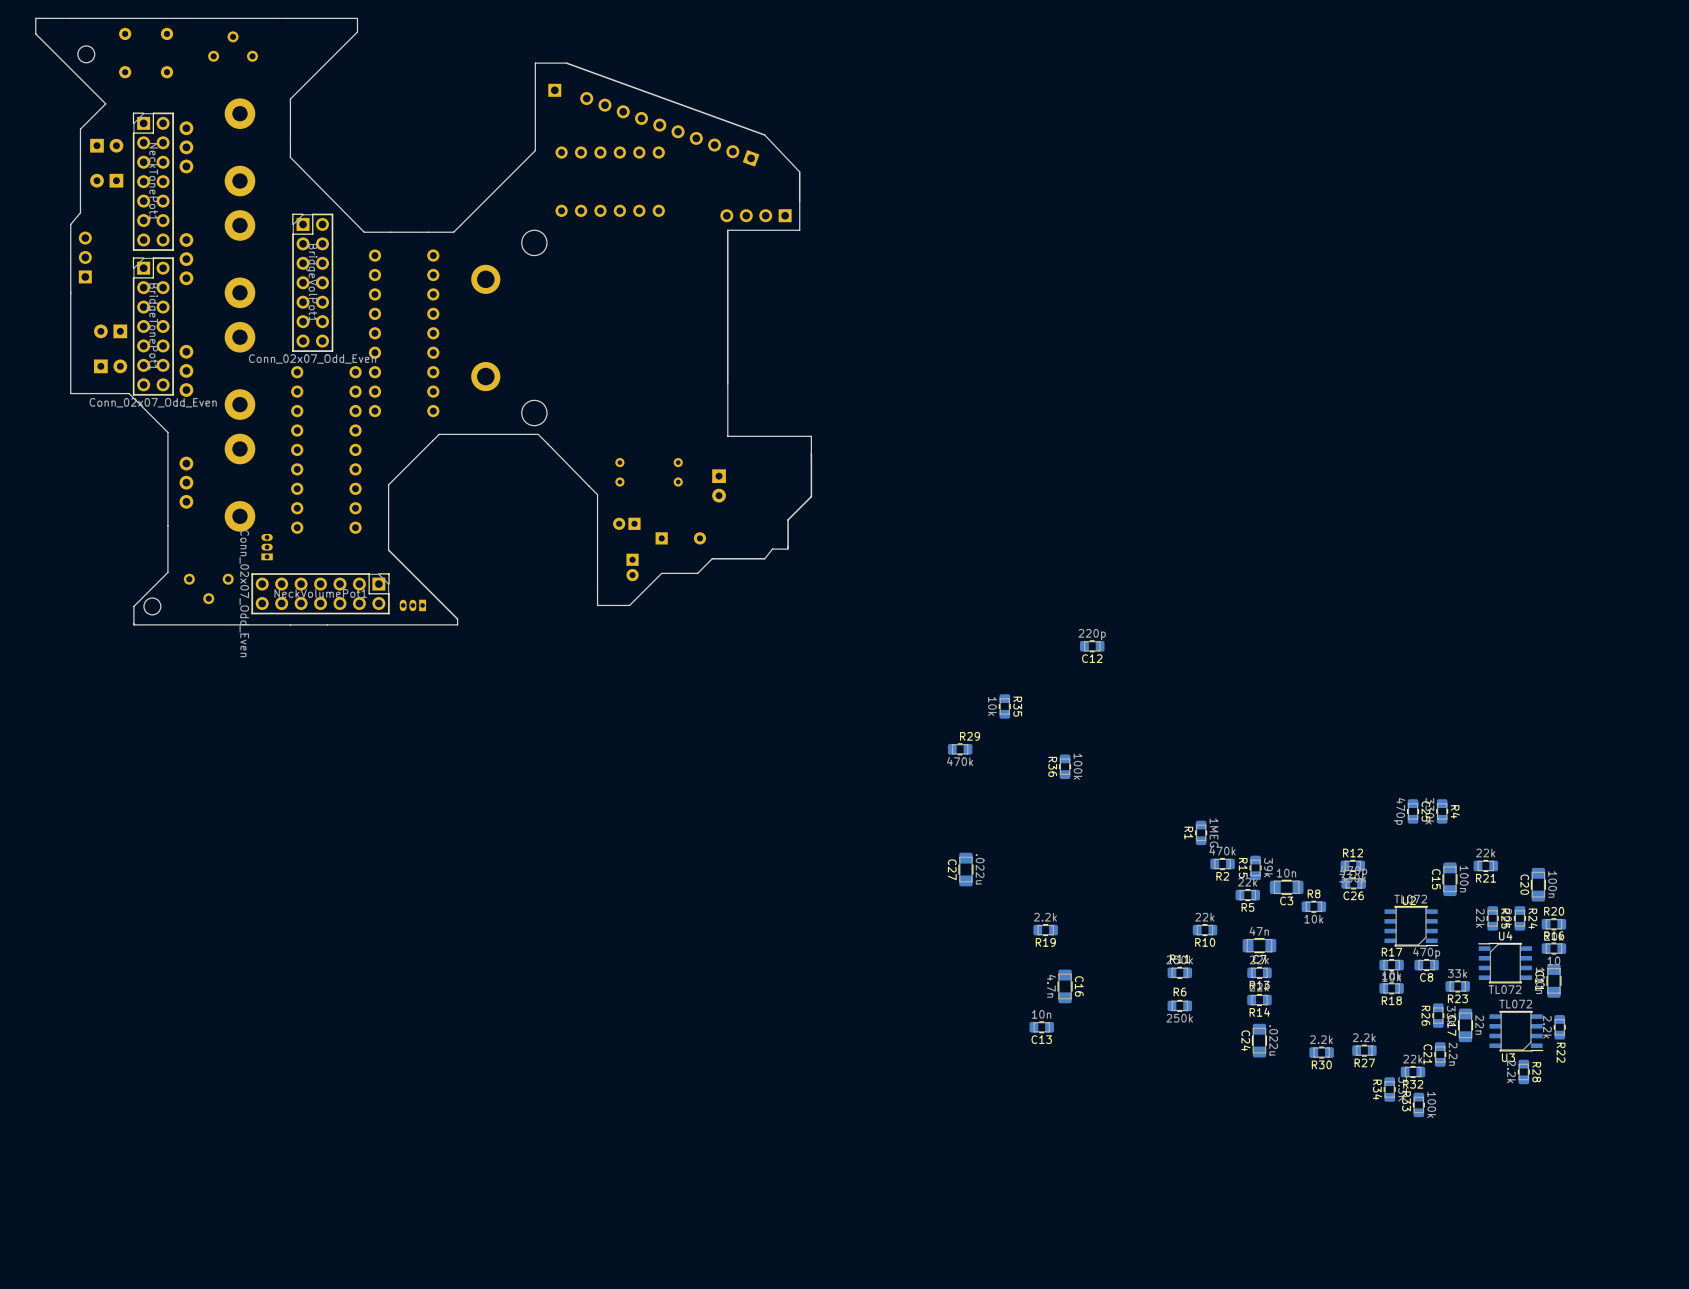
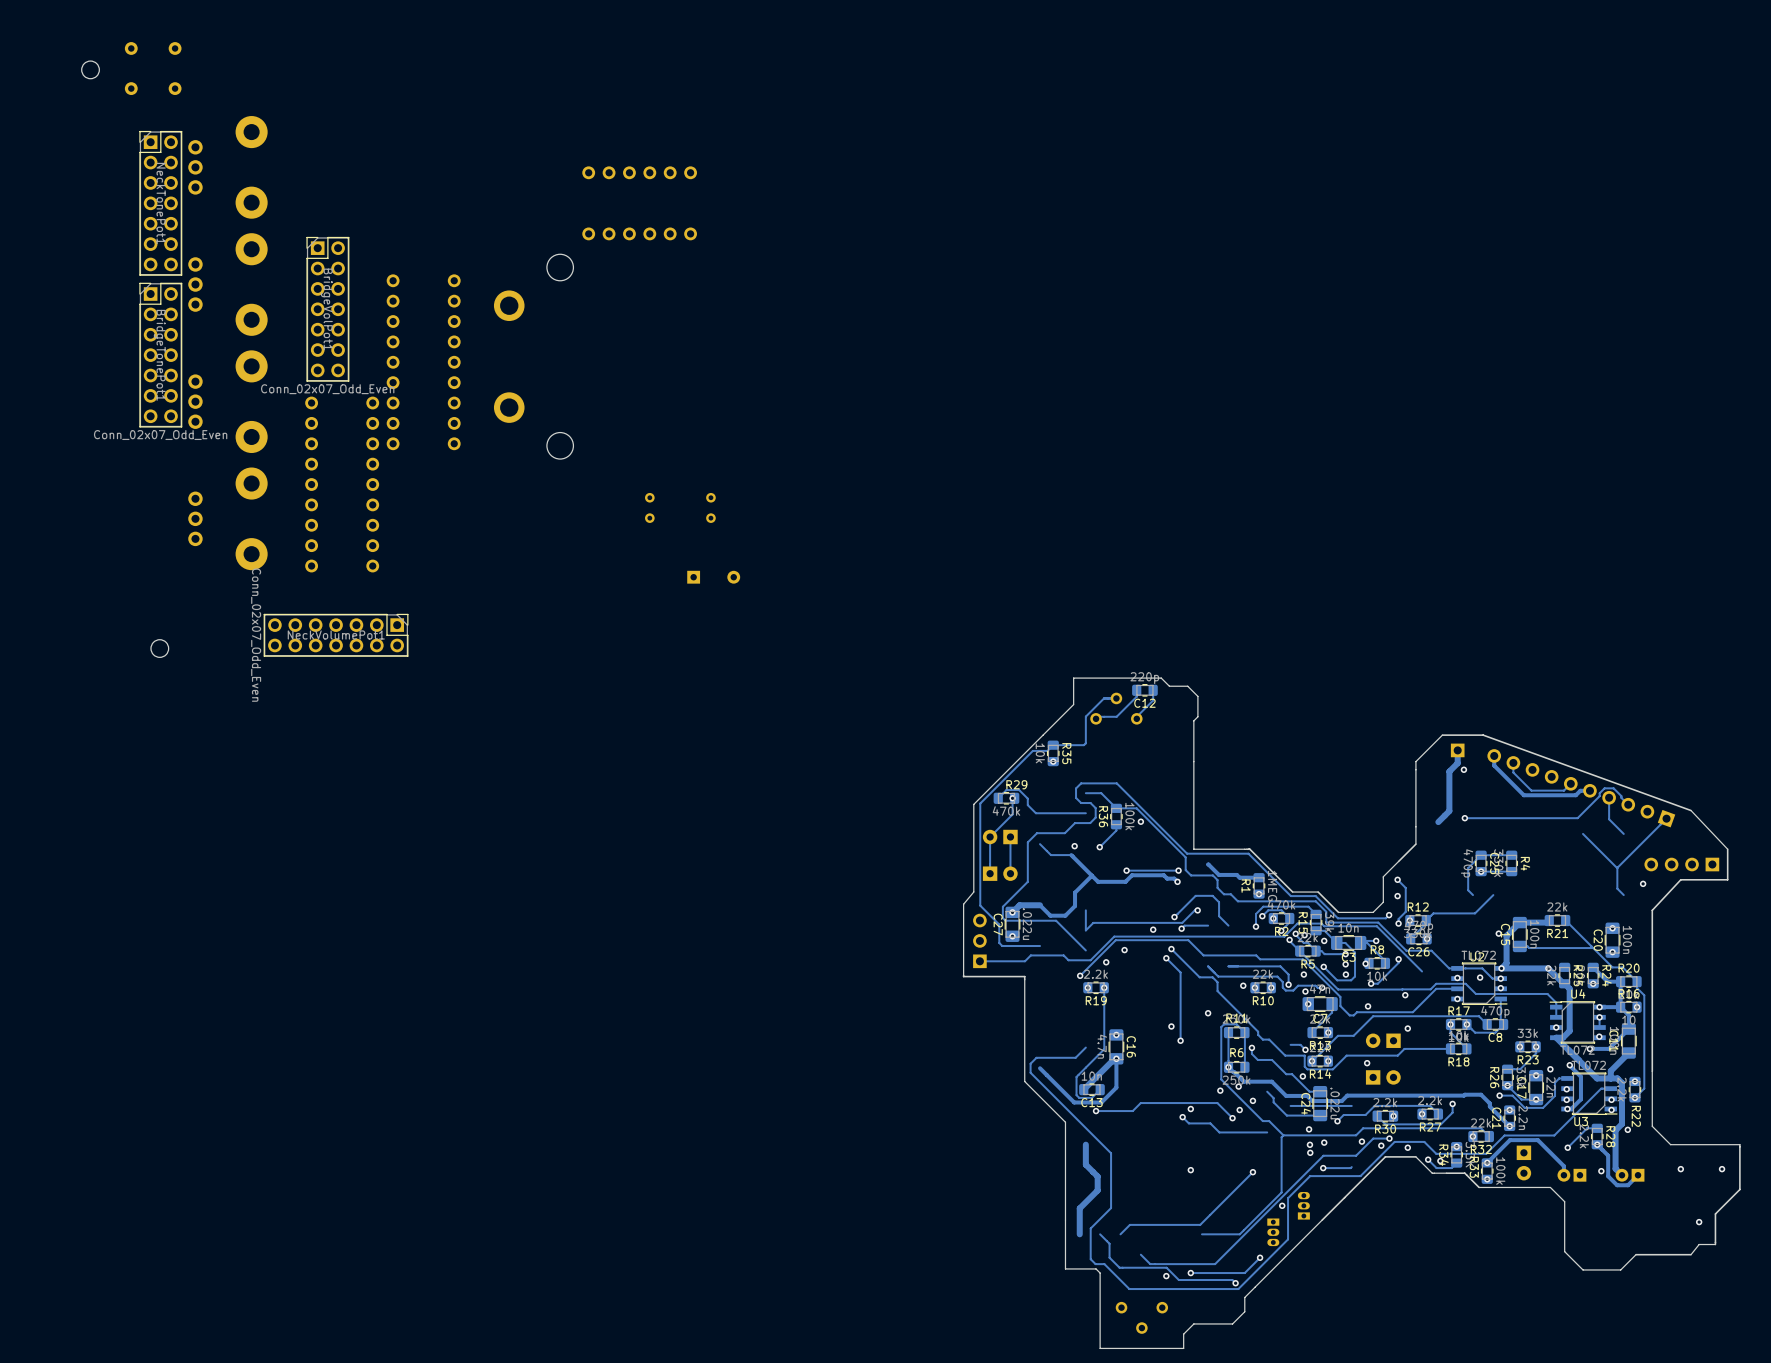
board edge: (357, 18) (35, 18) (35, 33) (105, 103) (80, 129) (80, 212) (70, 224) (70, 393) (129, 393) (167, 432) (167, 572) (133, 606) (133, 624) (457, 624) (457, 619) (388, 550) (388, 484) (439, 434) (538, 434) (597, 494) (597, 605) (629, 605) (661, 573) (697, 573) (712, 558) (764, 558) (772, 549) (788, 549) (788, 519) (811, 496) (811, 436) (727, 436) (727, 230) (799, 230) (799, 171) (764, 135) (566, 63) (535, 63) (535, 150) (453, 232) (364, 232) (290, 157) (290, 99) (357, 32) (357, 18) -> none
part: (233, 46) -> none
part: (554, 90) -> none
part: (669, 129) -> none
part: (106, 145) -> none
part: (106, 180) -> none
part: (755, 215) -> none
part: (85, 257) -> none
part: (110, 331) -> none
part: (110, 366) -> none
part: (719, 485) -> none
part: (626, 523) -> none
part: (267, 547) -> none
part: (632, 567) -> none
part: (208, 588) -> none
part: (412, 605) -> none
board edge: none -> (1161, 678) (1169, 686) (1187, 686) (1197, 696) (1197, 716) (1193, 720) (1193, 849) (1249, 849) (1292, 892) (1318, 892) (1338, 912) (1373, 912) (1383, 902) (1383, 876) (1415, 844) (1415, 761) (1442, 735) (1483, 735) (1691, 810) (1727, 849) (1727, 879) (1680, 879) (1652, 910) (1652, 1126) (1670, 1144) (1739, 1144) (1739, 1189) (1715, 1213) (1715, 1244) (1699, 1244) (1691, 1254) (1635, 1254) (1620, 1269) (1583, 1269) (1564, 1251) (1564, 1201) (1550, 1187) (1479, 1187) (1464, 1173) (1432, 1173) (1415, 1156) (1385, 1156) (1244, 1297) (1244, 1311) (1232, 1323) (1193, 1323) (1183, 1334) (1183, 1348) (1100, 1348) (1100, 1273) (1096, 1268) (1065, 1268) (1065, 1122) (1024, 1081) (1024, 976) (963, 976) (963, 904) (973, 892) (973, 804) (1073, 704) (1073, 678) (1161, 678)
track: none -> (1136, 690) (1136, 696) (1116, 716) (1096, 716)
track: none -> (1153, 690) (1153, 700) (1136, 716)
track: none -> (1116, 698) (1104, 698) (1085, 716) (1085, 743) (1083, 745) (1053, 745) (1047, 750) (1032, 750) (980, 803) (980, 905) (999, 924) (999, 942) (1002, 946) (1040, 946)
part: none -> (1116, 708)
track: none -> (1457, 750) (1457, 763) (1449, 771) (1449, 811) (1438, 822)
part: none -> (1457, 750)
track: none -> (1494, 755) (1494, 765) (1523, 795) (1575, 795) (1580, 790) (1589, 790)
via: none -> (1053, 761)
track: none -> (1513, 762) (1513, 772) (1531, 790) (1564, 790) (1570, 783)
via: none -> (1463, 769)
part: none -> (1581, 788)
track: none -> (1085, 793) (1101, 793) (1116, 808) (1136, 808) (1185, 857) (1185, 870) (1191, 875) (1212, 875) (1217, 880) (1217, 887) (1223, 894) (1230, 894) (1237, 901) (1315, 901) (1326, 911) (1326, 922) (1378, 922) (1406, 950) (1431, 950) (1449, 968) (1482, 968) (1492, 978) (1500, 978)
track: none -> (1609, 797) (1609, 819) (1623, 833)
track: none -> (998, 798) (1006, 790) (1019, 790) (1027, 798) (1027, 805) (1035, 813) (1085, 813)
track: none -> (1012, 798) (1012, 814) (990, 837) (990, 873)
via: none -> (1012, 798)
track: none -> (1628, 804) (1613, 788) (1604, 788) (1599, 793) (1599, 796) (1577, 818) (1464, 818)
via: none -> (1464, 818)
track: none -> (1666, 818) (1617, 867)
via: none -> (1140, 821)
track: none -> (1116, 824) (1116, 830) (1099, 847)
track: none -> (1583, 833) (1617, 867)
part: none -> (1000, 837)
track: none -> (1010, 837) (1010, 873)
track: none -> (1040, 844) (1050, 855) (1071, 855) (1098, 881) (1125, 881) (1132, 875) (1163, 875) (1167, 878) (1174, 878) (1177, 881)
via: none -> (1074, 846)
via: none -> (1099, 847)
track: none -> (1511, 855) (1481, 855) (1468, 868) (1468, 890) (1472, 895)
track: none -> (1208, 864) (1218, 874) (1259, 877)
part: none -> (1681, 864)
track: none -> (1617, 867) (1617, 888) (1623, 895)
via: none -> (1126, 870)
track: none -> (1178, 870) (1126, 870)
via: none -> (1178, 870)
via: none -> (1481, 871)
track: none -> (1511, 871) (1481, 871)
part: none -> (1000, 873)
track: none -> (1091, 875) (1075, 892) (1075, 906) (1065, 915) (1050, 915) (1040, 905) (1019, 905) (1012, 912)
track: none -> (1397, 879) (1405, 887) (1405, 911) (1398, 919) (1398, 923)
via: none -> (1397, 879)
via: none -> (1177, 881)
via: none -> (1643, 883)
via: none -> (1259, 894)
track: none -> (1493, 895) (1475, 913) (1433, 913) (1410, 938)
via: none -> (1397, 896)
track: none -> (1197, 910) (1194, 910) (1182, 922) (1093, 922) (1085, 930) (1085, 910)
via: none -> (1197, 910)
via: none -> (1012, 912)
track: none -> (1316, 914) (1308, 906) (1263, 906) (1255, 913) (1255, 926)
track: none -> (1389, 915) (1385, 918) (1337, 918) (1315, 896) (1290, 896) (1248, 853) (1187, 853) (1116, 783) (1081, 783) (1076, 788) (1076, 797) (1081, 803) (1090, 803) (1095, 808) (1095, 817) (1090, 823) (1075, 823) (1064, 833) (1037, 833) (1027, 842) (1027, 881) (1002, 906) (1002, 918) (1005, 920) (1056, 920) (1085, 950)
via: none -> (1389, 915)
track: none -> (1262, 916) (1268, 910) (1281, 910) (1289, 918) (1289, 922) (1281, 930)
via: none -> (1262, 916)
track: none -> (1174, 917) (1195, 895) (1212, 895) (1219, 902) (1219, 916) (1228, 925)
via: none -> (1174, 917)
via: none -> (1273, 918)
via: none -> (1409, 920)
track: none -> (1549, 920) (1547, 922) (1519, 922) (1506, 935) (1506, 963) (1501, 968)
track: none -> (1565, 920) (1612, 967) (1622, 967) (1637, 981)
via: none -> (1398, 923)
track: none -> (1208, 925) (1184, 925) (1181, 928)
via: none -> (1255, 926)
via: none -> (1181, 928)
via: none -> (1612, 928)
via: none -> (1153, 929)
via: none -> (1281, 930)
track: none -> (1316, 930) (1324, 930) (1336, 942) (1345, 942) (1355, 952) (1355, 976) (1351, 980) (1337, 980) (1323, 966)
track: none -> (1295, 933) (1303, 942) (1307, 942) (1316, 951) (1321, 951) (1324, 954) (1345, 954)
via: none -> (1295, 933)
via: none -> (1498, 933)
via: none -> (1304, 935)
via: none -> (1012, 936)
via: none -> (1427, 938)
track: none -> (1289, 939) (1338, 989) (1430, 989) (1436, 983) (1465, 983) (1475, 993) (1547, 993) (1556, 1002) (1556, 1017)
via: none -> (1289, 939)
part: none -> (979, 940)
via: none -> (1324, 940)
track: none -> (1376, 940) (1362, 940) (1360, 942) (1367, 942) (1385, 963)
via: none -> (1376, 940)
track: none -> (1519, 946) (1593, 948)
track: none -> (1171, 949) (1199, 977) (1212, 977) (1217, 982) (1217, 991) (1258, 1031) (1258, 1034) (1262, 1039) (1269, 1039) (1285, 1055) (1304, 1055) (1304, 1066) (1307, 1069) (1332, 1069) (1346, 1055) (1397, 1055) (1404, 1048) (1450, 1048)
via: none -> (1171, 949)
via: none -> (1124, 950)
via: none -> (1612, 952)
via: none -> (1345, 954)
track: none -> (1166, 958) (1180, 972) (1180, 1040)
via: none -> (1166, 958)
track: none -> (1398, 959) (1398, 962) (1377, 983) (1371, 983)
via: none -> (1398, 959)
track: none -> (979, 961) (1024, 961) (1030, 955) (1063, 955) (1068, 960) (1090, 960) (1114, 936) (1284, 936) (1297, 923) (1321, 923) (1324, 926) (1376, 926) (1422, 971)
via: none -> (1106, 962)
via: none -> (1345, 964)
via: none -> (1365, 963)
track: none -> (1208, 966) (1218, 976) (1277, 976) (1282, 981) (1282, 987) (1285, 990) (1293, 990) (1298, 985) (1315, 985) (1322, 987)
track: none -> (1228, 966) (1280, 966) (1288, 974) (1288, 984)
via: none -> (1323, 966)
track: none -> (1593, 967) (1607, 981) (1620, 981) (1620, 1007)
track: none -> (1501, 968) (1548, 968) (1569, 988) (1569, 1031) (1563, 1037) (1556, 1037) (1597, 1078) (1617, 1078) (1621, 1082) (1621, 1124) (1615, 1130) (1615, 1168) (1621, 1175)
via: none -> (1501, 968)
via: none -> (1548, 968)
via: none -> (1303, 974)
via: none -> (1345, 974)
track: none -> (1080, 975) (1115, 940) (1188, 940) (1203, 955) (1256, 955) (1260, 959) (1302, 959) (1340, 996) (1340, 1006) (1349, 1015) (1353, 1015) (1356, 1012) (1412, 1012) (1436, 988) (1457, 988)
via: none -> (1080, 975)
via: none -> (1457, 977)
via: none -> (1480, 977)
via: none -> (1500, 978)
track: none -> (1637, 981) (1637, 988) (1644, 995) (1644, 1088) (1634, 1097)
via: none -> (1371, 983)
via: none -> (1593, 983)
via: none -> (1288, 984)
via: none -> (1243, 985)
via: none -> (1087, 987)
track: none -> (1104, 987) (1104, 1049) (1076, 1076) (1076, 1095) (1079, 1097) (1091, 1097) (1100, 1089)
via: none -> (1104, 987)
via: none -> (1254, 987)
via: none -> (1271, 987)
via: none -> (1322, 987)
via: none -> (1500, 988)
via: none -> (1305, 991)
via: none -> (1405, 995)
via: none -> (1457, 998)
track: none -> (1500, 998) (1500, 1021) (1503, 1024) (1495, 1032) (1475, 1032) (1466, 1024)
via: none -> (1308, 1004)
track: none -> (1332, 1004) (1332, 1012) (1312, 1032)
via: none -> (1368, 1006)
via: none -> (1599, 1007)
track: none -> (1620, 1007) (1599, 1007)
track: none -> (1620, 1007) (1628, 1015) (1628, 1029) (1609, 1048) (1589, 1048)
via: none -> (1637, 1007)
via: none -> (1208, 1013)
track: none -> (1599, 1017) (1599, 1027)
via: none -> (1599, 1017)
track: none -> (1450, 1024) (1450, 1032) (1466, 1048)
via: none -> (1450, 1024)
via: none -> (1466, 1024)
track: none -> (1487, 1024) (1478, 1016) (1373, 1016) (1353, 1035) (1338, 1035) (1311, 1061)
via: none -> (1171, 1026)
via: none -> (1556, 1027)
via: none -> (1407, 1028)
track: none -> (1228, 1032) (1228, 1067) (1243, 1081) (1271, 1081) (1286, 1095) (1307, 1095) (1312, 1101) (1341, 1101) (1347, 1095) (1481, 1094) (1509, 1126)
via: none -> (1328, 1032)
via: none -> (1116, 1034)
via: none -> (1599, 1036)
via: none -> (1180, 1040)
part: none -> (1383, 1040)
track: none -> (1290, 1044) (1300, 1044) (1305, 1049)
via: none -> (1519, 1046)
track: none -> (1536, 1046) (1536, 1053) (1520, 1069) (1507, 1069)
via: none -> (1536, 1046)
track: none -> (1085, 1047) (1075, 1057) (1036, 1057) (1030, 1063) (1030, 1072) (1111, 1153) (1111, 1208) (1090, 1228) (1090, 1259) (1095, 1264) (1104, 1264) (1129, 1289) (1238, 1289) (1288, 1239) (1288, 1198) (1310, 1176) (1360, 1176) (1394, 1141) (1424, 1141) (1436, 1153) (1486, 1153) (1504, 1135) (1554, 1135) (1601, 1088) (1610, 1088)
track: none -> (1251, 1047) (1251, 1054) (1257, 1059) (1272, 1059) (1286, 1074) (1292, 1074) (1309, 1091) (1320, 1091)
via: none -> (1251, 1047)
via: none -> (1589, 1048)
via: none -> (1305, 1049)
track: none -> (1628, 1052) (1610, 1071) (1610, 1078)
via: none -> (1116, 1058)
via: none -> (1311, 1061)
via: none -> (1328, 1061)
via: none -> (1367, 1063)
track: none -> (1569, 1065) (1580, 1076) (1580, 1099) (1571, 1109) (1567, 1109)
via: none -> (1569, 1065)
via: none -> (1228, 1067)
track: none -> (1244, 1067) (1244, 1032) (1236, 1024) (1223, 1024) (1221, 1027) (1221, 1079) (1262, 1121) (1269, 1121) (1283, 1135)
track: none -> (1040, 1068) (1074, 1102) (1101, 1102) (1116, 1087) (1116, 1058) (1083, 1089)
via: none -> (1550, 1069)
via: none -> (1536, 1075)
via: none -> (1302, 1076)
part: none -> (1383, 1077)
track: none -> (1567, 1078) (1559, 1078) (1555, 1082) (1555, 1095) (1543, 1107) (1524, 1107) (1512, 1095) (1499, 1095)
via: none -> (1634, 1081)
track: none -> (1507, 1085) (1521, 1099) (1536, 1099)
via: none -> (1507, 1085)
via: none -> (1238, 1086)
via: none -> (1566, 1089)
via: none -> (1220, 1090)
track: none -> (1267, 1091) (1273, 1098) (1273, 1102) (1286, 1115) (1320, 1115)
via: none -> (1499, 1095)
via: none -> (1634, 1097)
via: none -> (1536, 1099)
via: none -> (1252, 1100)
via: none -> (1566, 1099)
via: none -> (1611, 1099)
track: none -> (1452, 1103) (1452, 1112) (1440, 1124) (1385, 1124) (1377, 1116)
via: none -> (1452, 1103)
track: none -> (1351, 1105) (1290, 1105)
via: none -> (1190, 1109)
via: none -> (1567, 1109)
via: none -> (1239, 1110)
via: none -> (1509, 1110)
via: none -> (1611, 1110)
track: none -> (1096, 1111) (1132, 1111) (1140, 1103) (1217, 1103) (1232, 1118)
via: none -> (1096, 1111)
via: none -> (1422, 1114)
track: none -> (1438, 1114) (1430, 1105) (1374, 1105) (1365, 1114) (1343, 1114) (1337, 1121)
via: none -> (1393, 1116)
track: none -> (1182, 1117) (1188, 1123) (1210, 1123) (1219, 1132) (1267, 1132)
via: none -> (1182, 1117)
via: none -> (1232, 1118)
via: none -> (1337, 1121)
via: none -> (1509, 1126)
track: none -> (1597, 1128) (1587, 1128) (1567, 1147)
via: none -> (1309, 1129)
via: none -> (1627, 1129)
track: none -> (1283, 1135) (1356, 1135) (1363, 1128) (1481, 1128) (1489, 1136)
track: none -> (1283, 1135) (1281, 1137) (1281, 1192) (1239, 1234) (1202, 1234)
via: none -> (1472, 1136)
track: none -> (1389, 1138) (1373, 1138) (1356, 1155) (1323, 1155) (1215, 1264) (1150, 1264) (1140, 1254)
via: none -> (1389, 1138)
via: none -> (1361, 1141)
via: none -> (1324, 1142)
track: none -> (1085, 1144) (1085, 1164) (1097, 1176) (1097, 1190) (1079, 1208) (1079, 1234)
via: none -> (1309, 1144)
track: none -> (1597, 1144) (1608, 1155) (1608, 1176) (1617, 1185) (1628, 1185) (1638, 1175)
via: none -> (1597, 1144)
via: none -> (1381, 1145)
via: none -> (1456, 1146)
via: none -> (1407, 1147)
via: none -> (1567, 1147)
via: none -> (1310, 1152)
track: none -> (1428, 1159) (1436, 1168) (1451, 1168) (1456, 1163)
via: none -> (1428, 1159)
via: none -> (1440, 1160)
track: none -> (1487, 1162) (1510, 1140) (1537, 1140) (1563, 1166) (1563, 1175)
via: none -> (1487, 1162)
part: none -> (1523, 1163)
track: none -> (1351, 1167) (1323, 1168)
via: none -> (1323, 1168)
via: none -> (1680, 1169)
via: none -> (1722, 1169)
via: none -> (1190, 1170)
via: none -> (1601, 1171)
track: none -> (1252, 1172) (1200, 1224) (1129, 1224) (1120, 1234)
via: none -> (1252, 1172)
part: none -> (1571, 1175)
part: none -> (1630, 1175)
via: none -> (1487, 1179)
via: none -> (1282, 1205)
part: none -> (1303, 1205)
via: none -> (1699, 1222)
part: none -> (1273, 1232)
track: none -> (1100, 1234) (1109, 1243) (1109, 1257) (1119, 1267) (1166, 1267) (1178, 1280) (1232, 1280) (1235, 1283)
track: none -> (1260, 1257) (1244, 1273) (1190, 1273)
via: none -> (1260, 1257)
via: none -> (1190, 1273)
via: none -> (1166, 1276)
via: none -> (1235, 1283)
part: none -> (1141, 1317)

